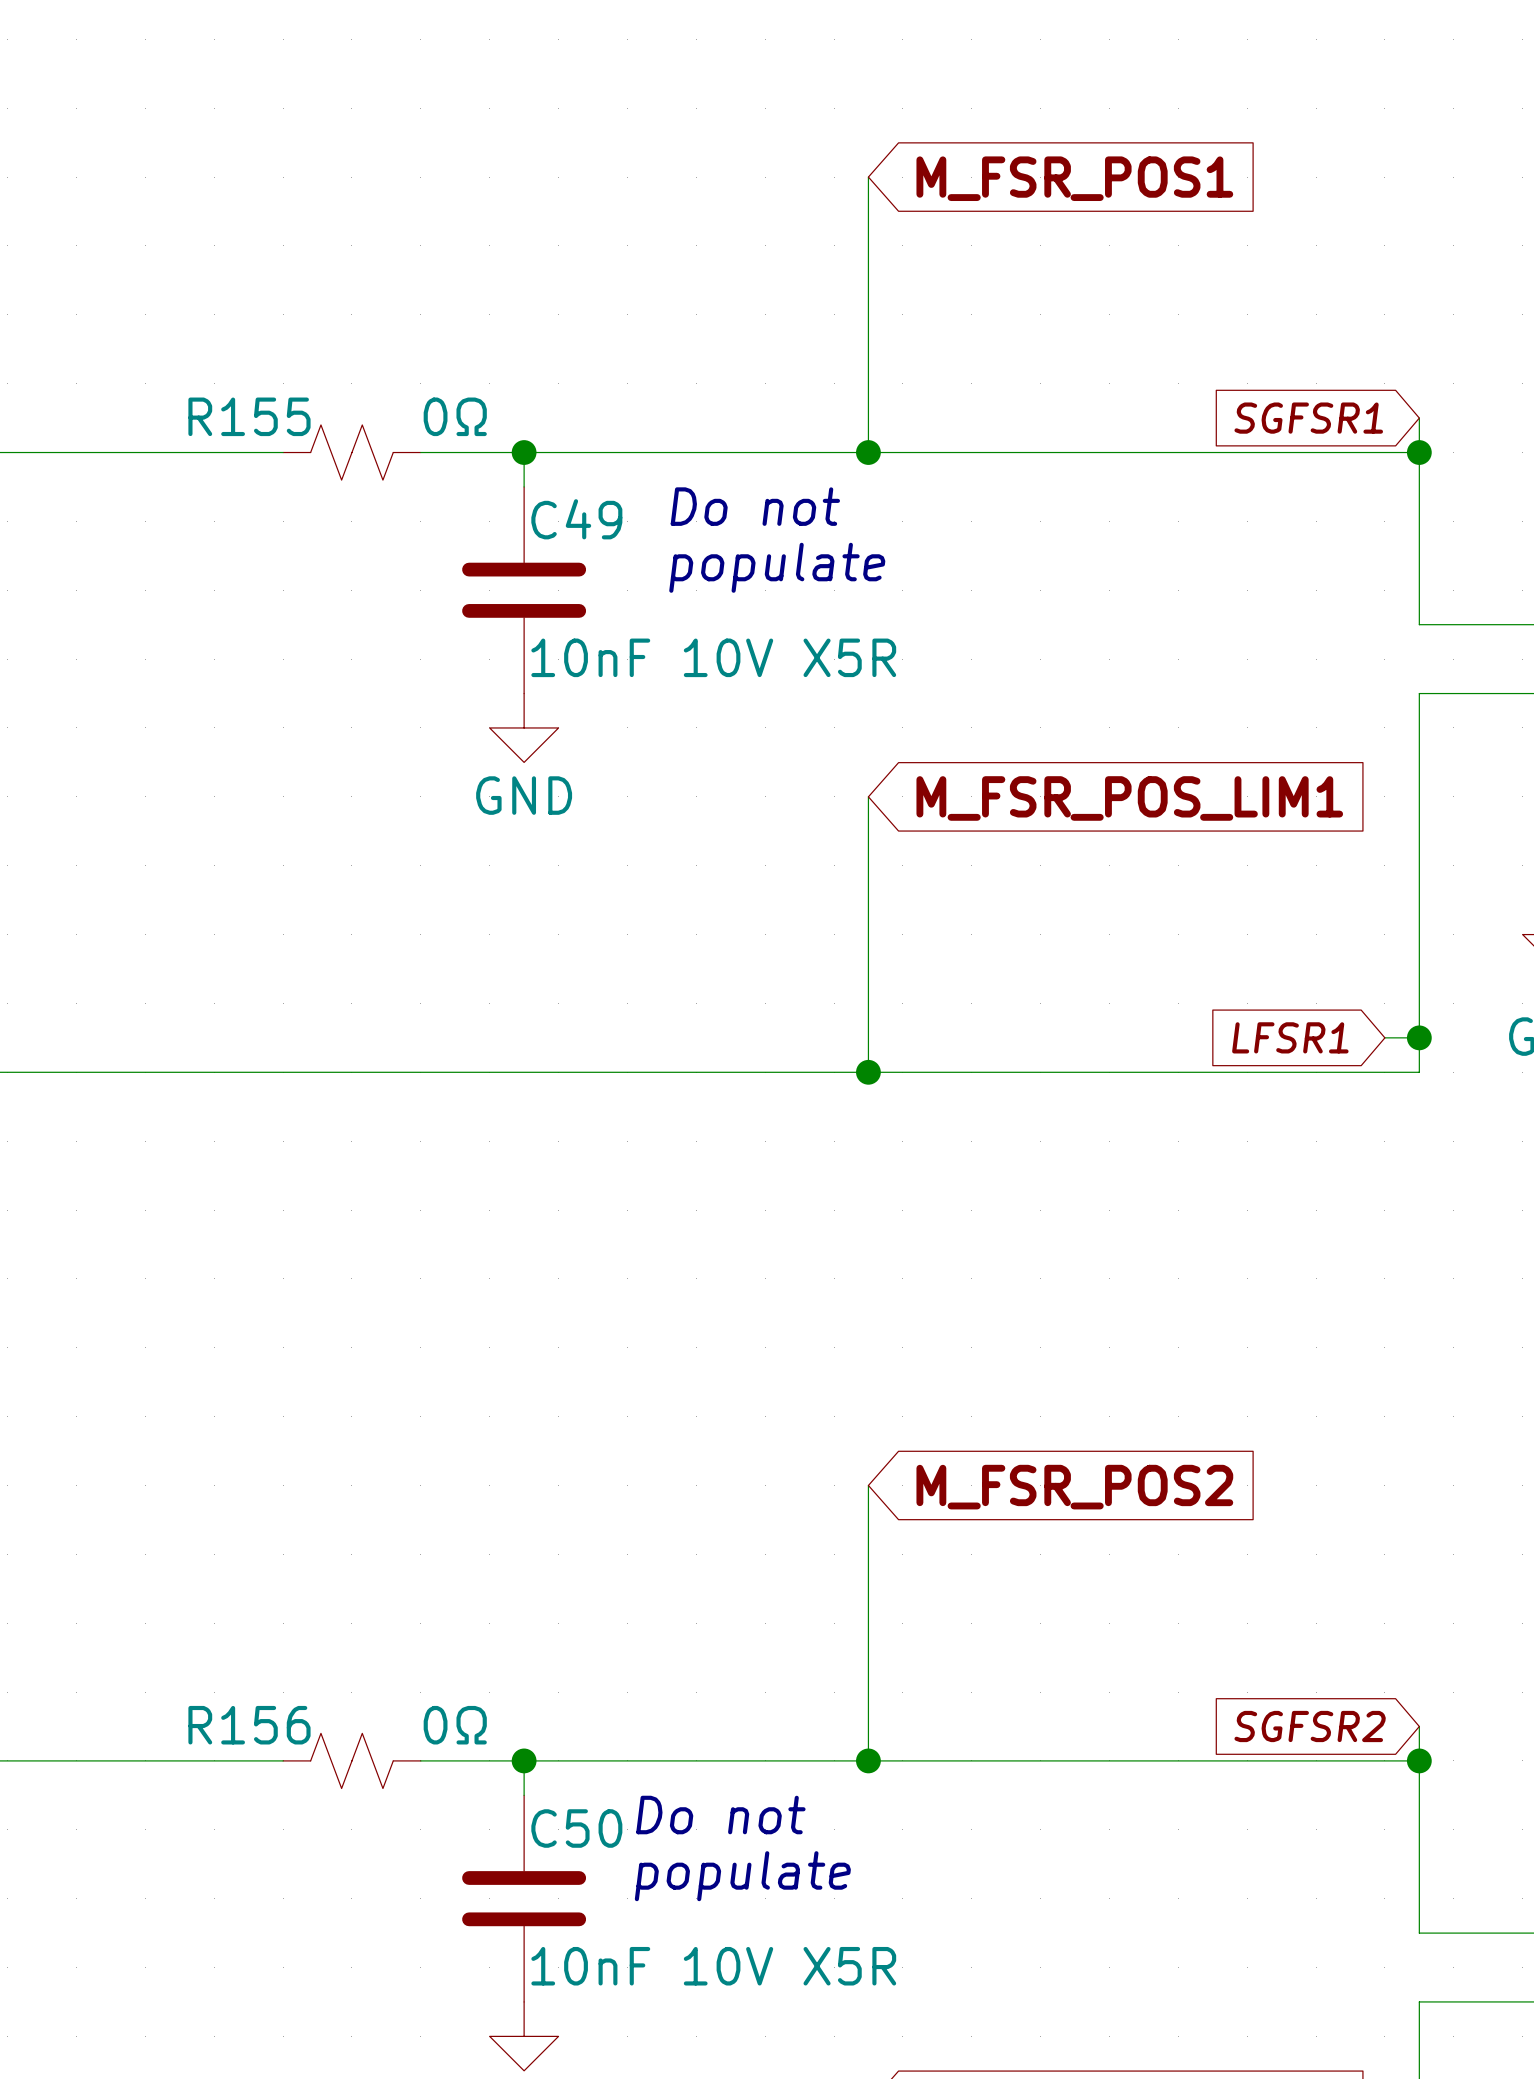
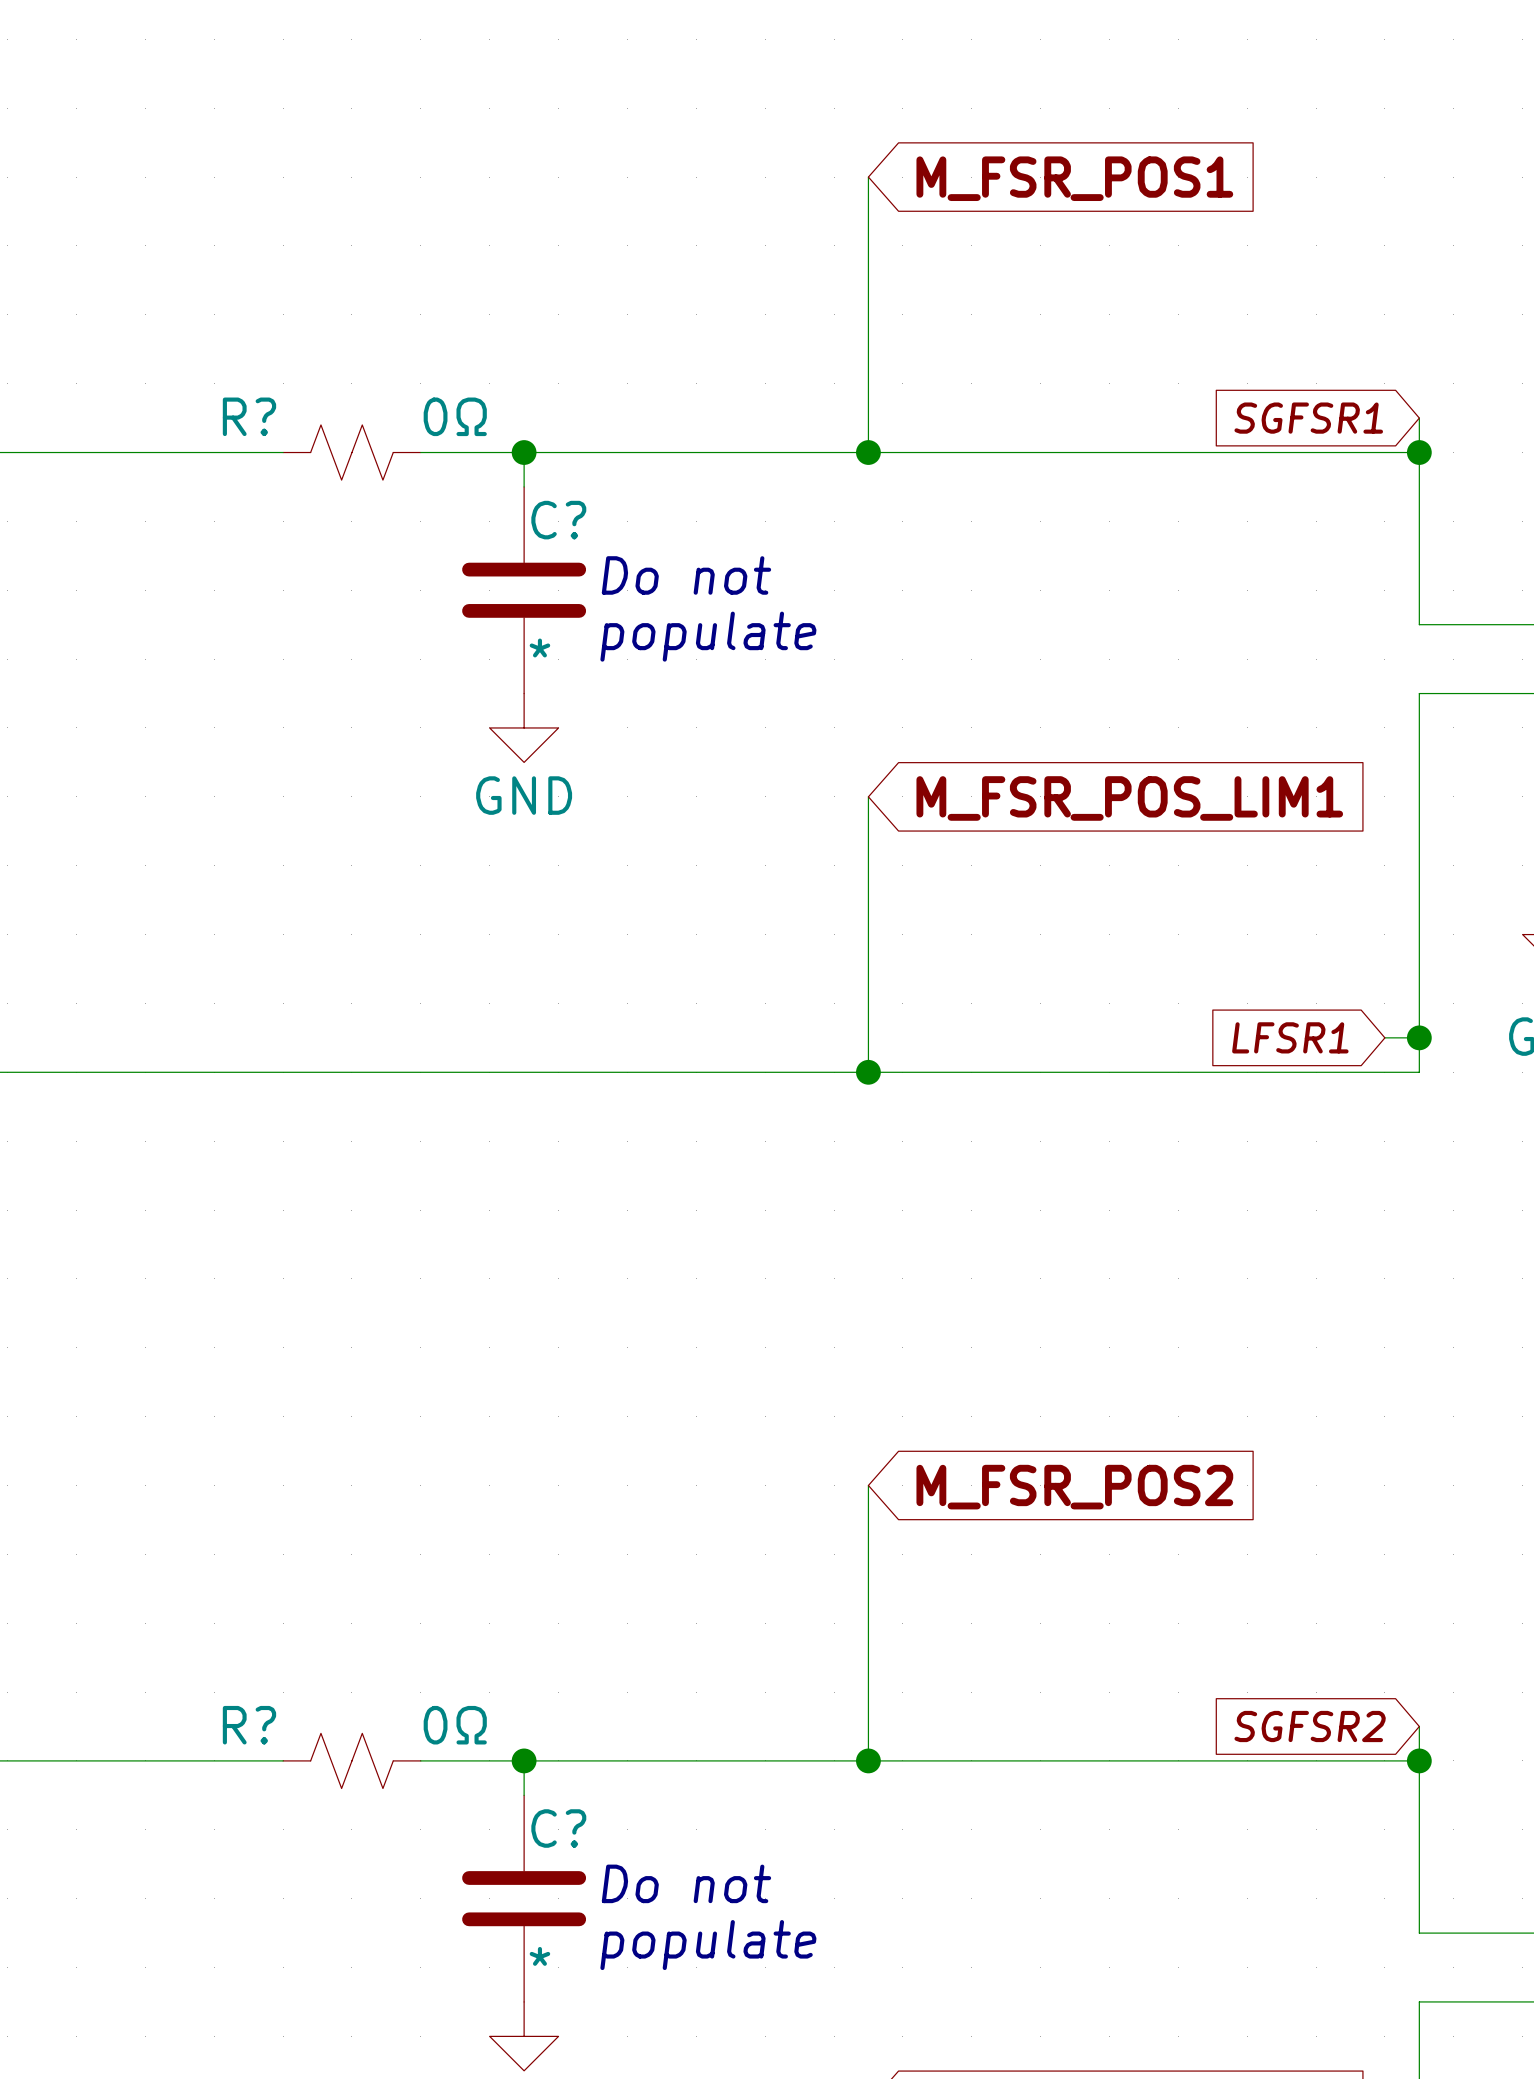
R155 name: R155 (249, 416) -> R? (249, 416)
text position: Do not (755, 506) -> Do not (686, 575)
C49 name: C49 (576, 519) -> C? (558, 520)
text position: populate (777, 567) -> populate (708, 636)
C49 value: 10nF 10V X5R (713, 657) -> * (539, 647)
R156 name: R156 (249, 1725) -> R? (249, 1725)
text position: Do not (720, 1815) -> Do not (686, 1883)
C50 name: C50 (576, 1828) -> C? (558, 1828)
text position: populate (742, 1876) -> populate (708, 1945)
C50 value: 10nF 10V X5R (713, 1966) -> * (539, 1956)

